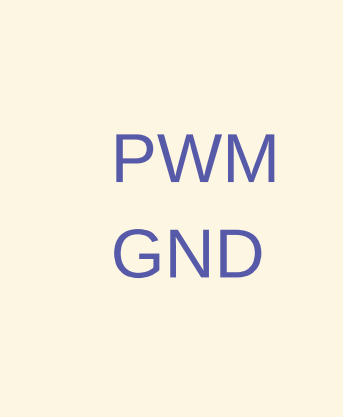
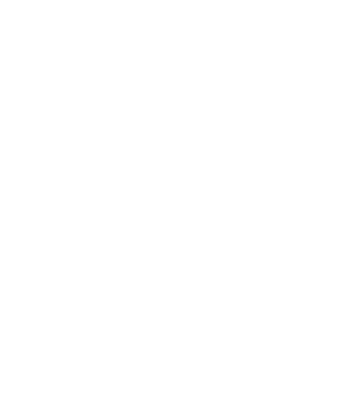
text: PWM (195, 158) -> none
text: GND (187, 253) -> none

